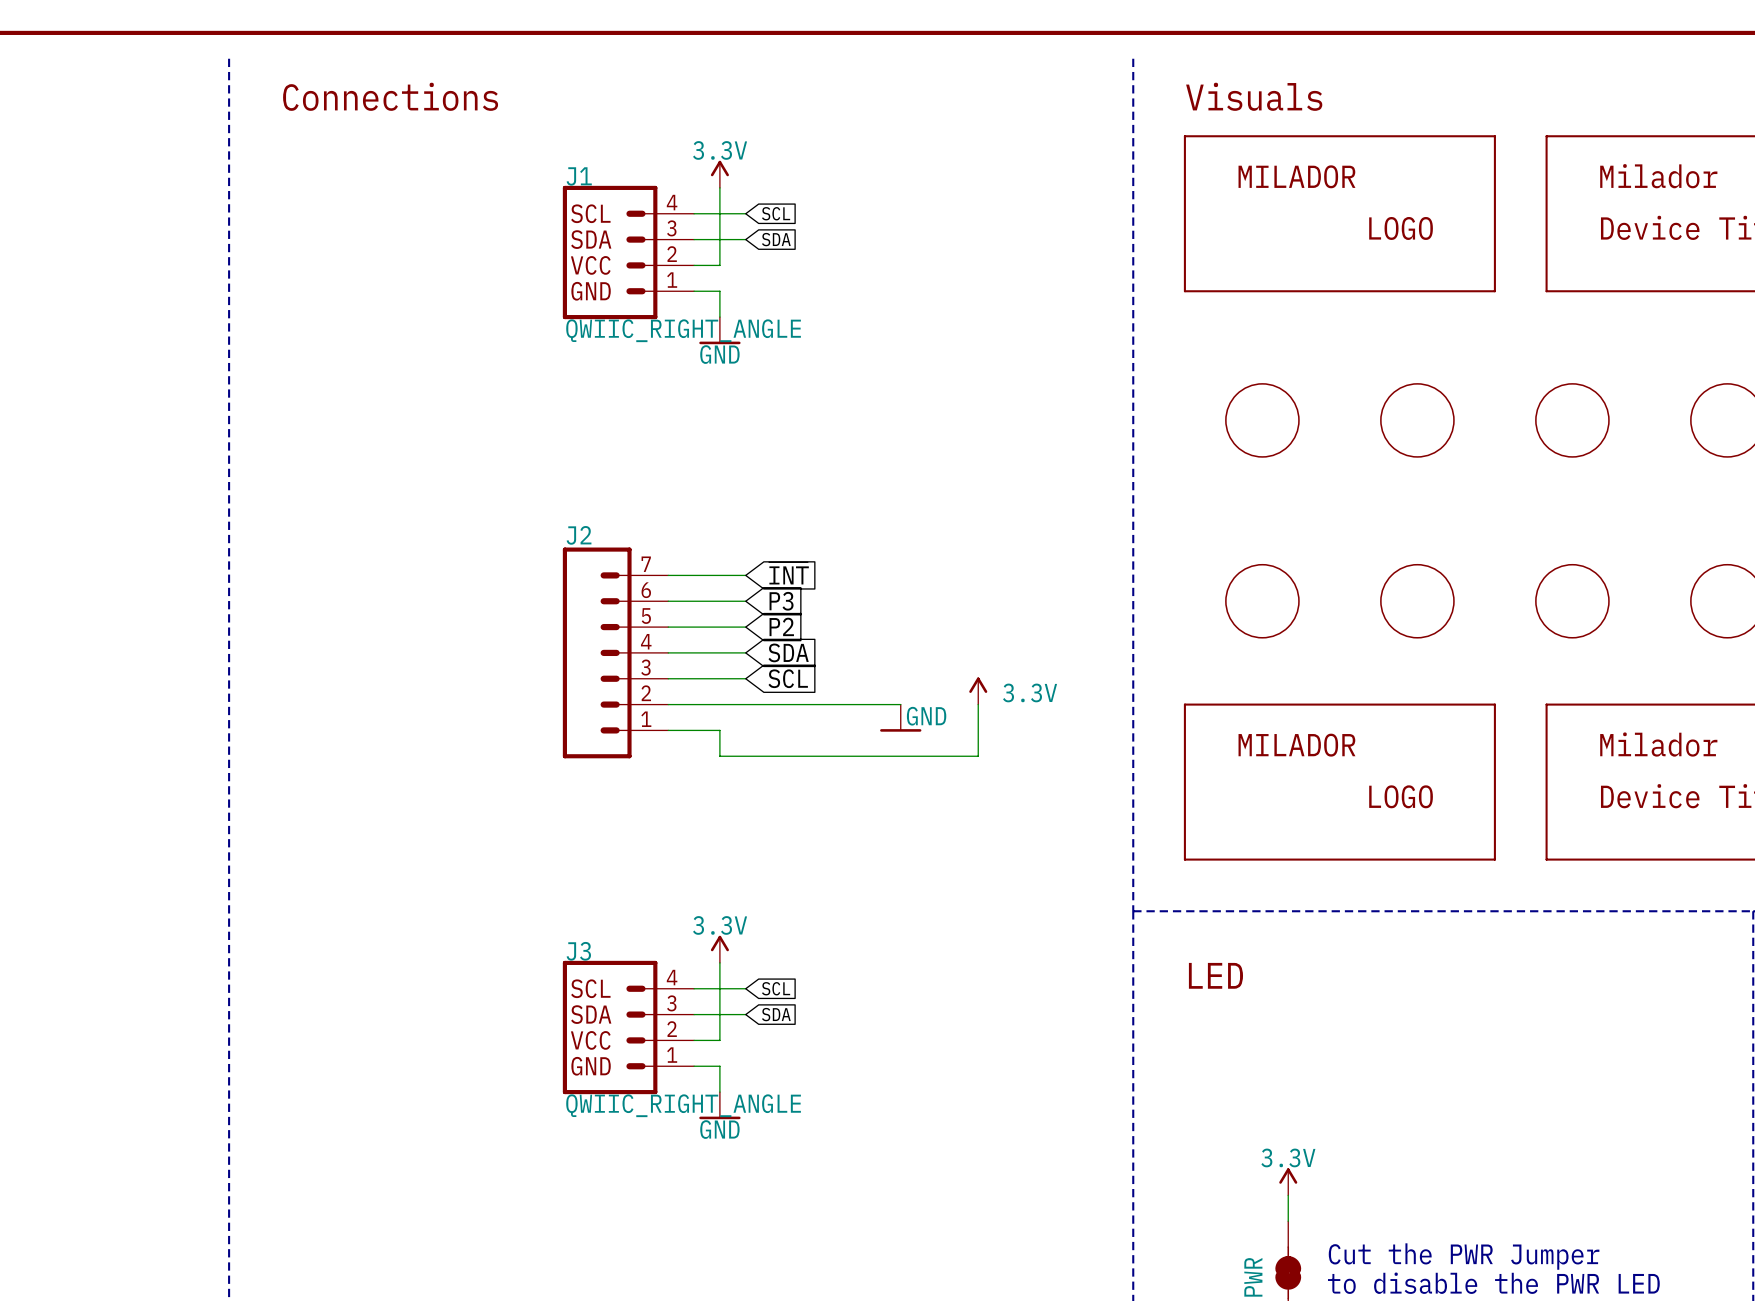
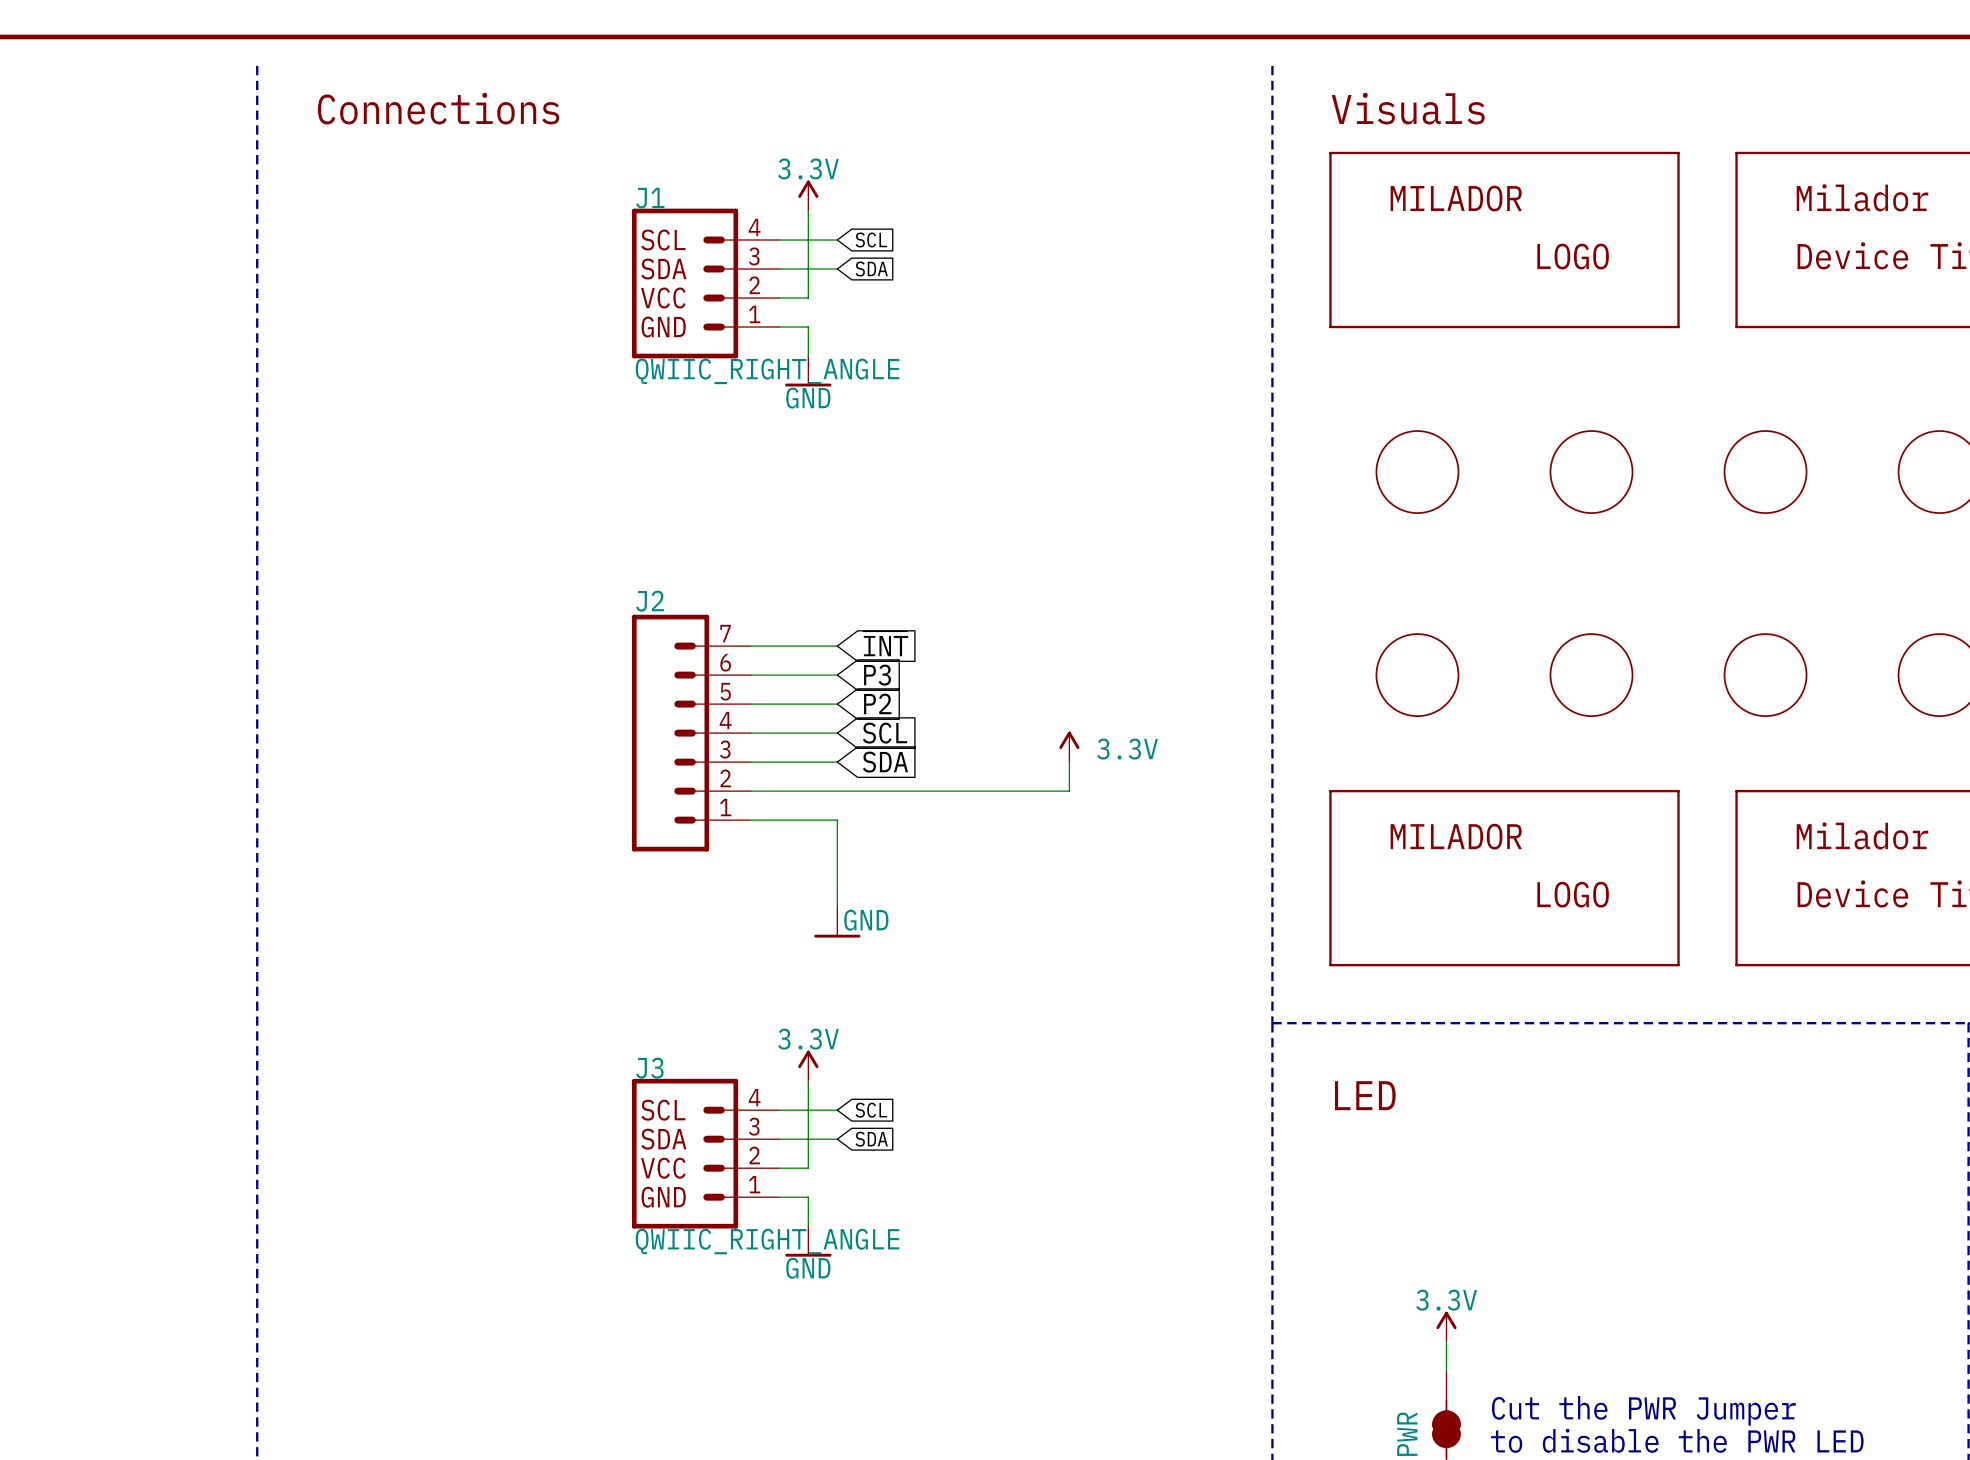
global label: SDA (788, 652) -> SCL (885, 733)
global label: SCL (788, 678) -> SDA (885, 762)
wire: none -> (1069, 762) (1069, 791) (1011, 791)
power symbol position: 3.3V (978, 691) -> 3.3V (1069, 746)
wire: (978, 704) (978, 756) (719, 756) (719, 730) -> (837, 907) (837, 820) (808, 820)
power symbol position: GND (900, 718) -> GND (837, 922)

